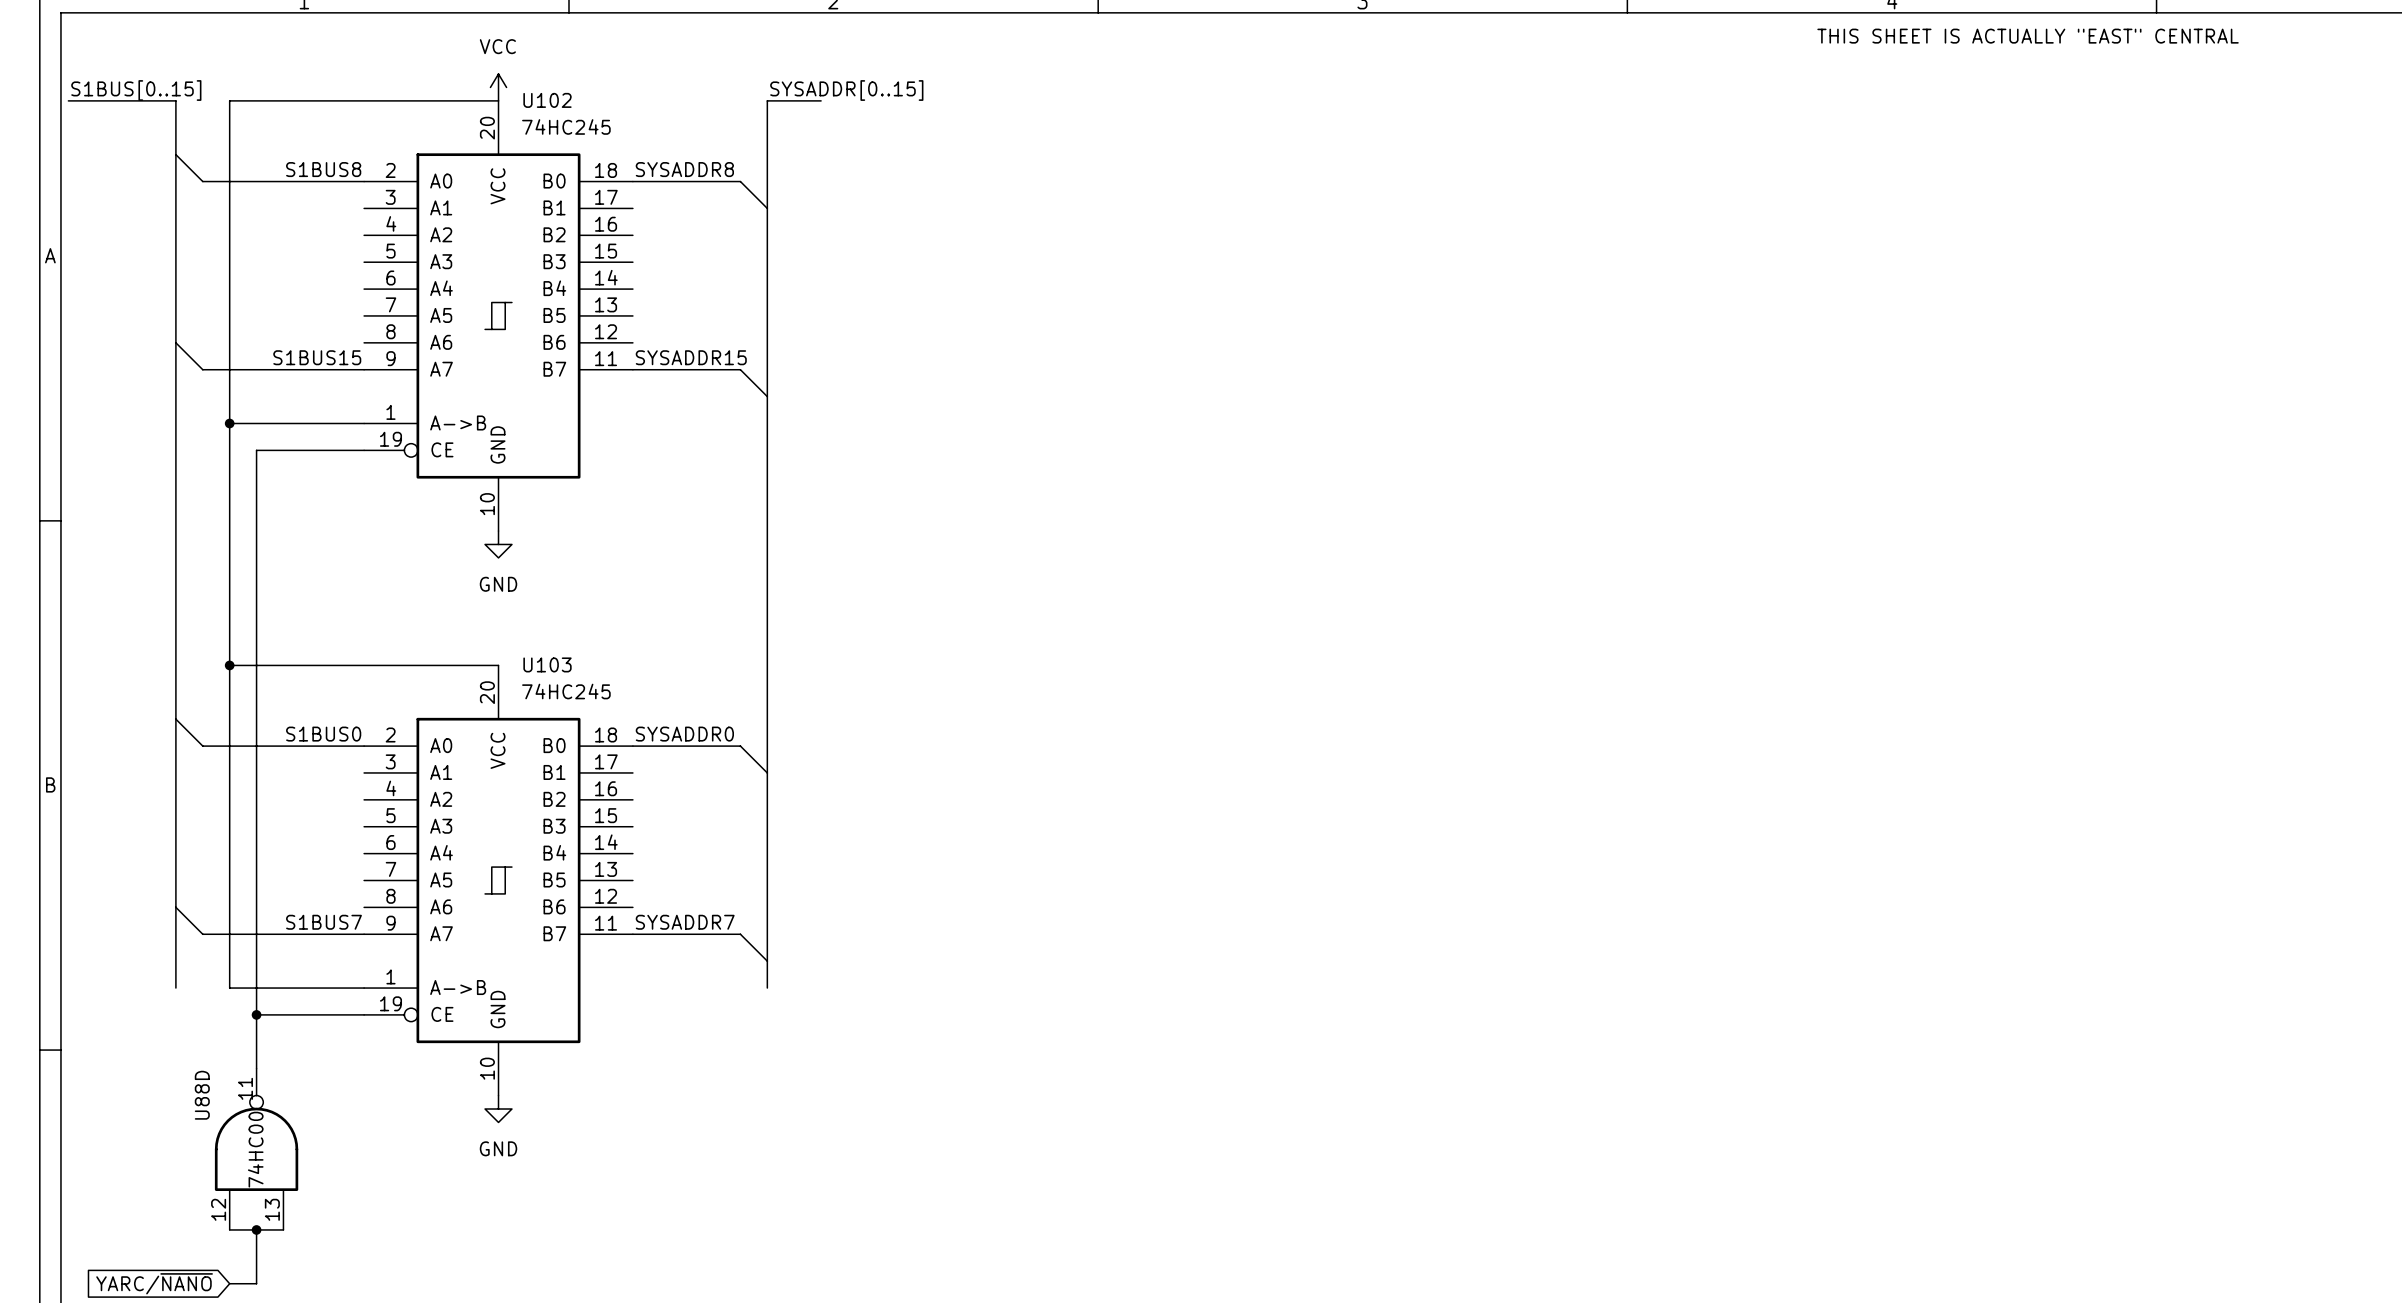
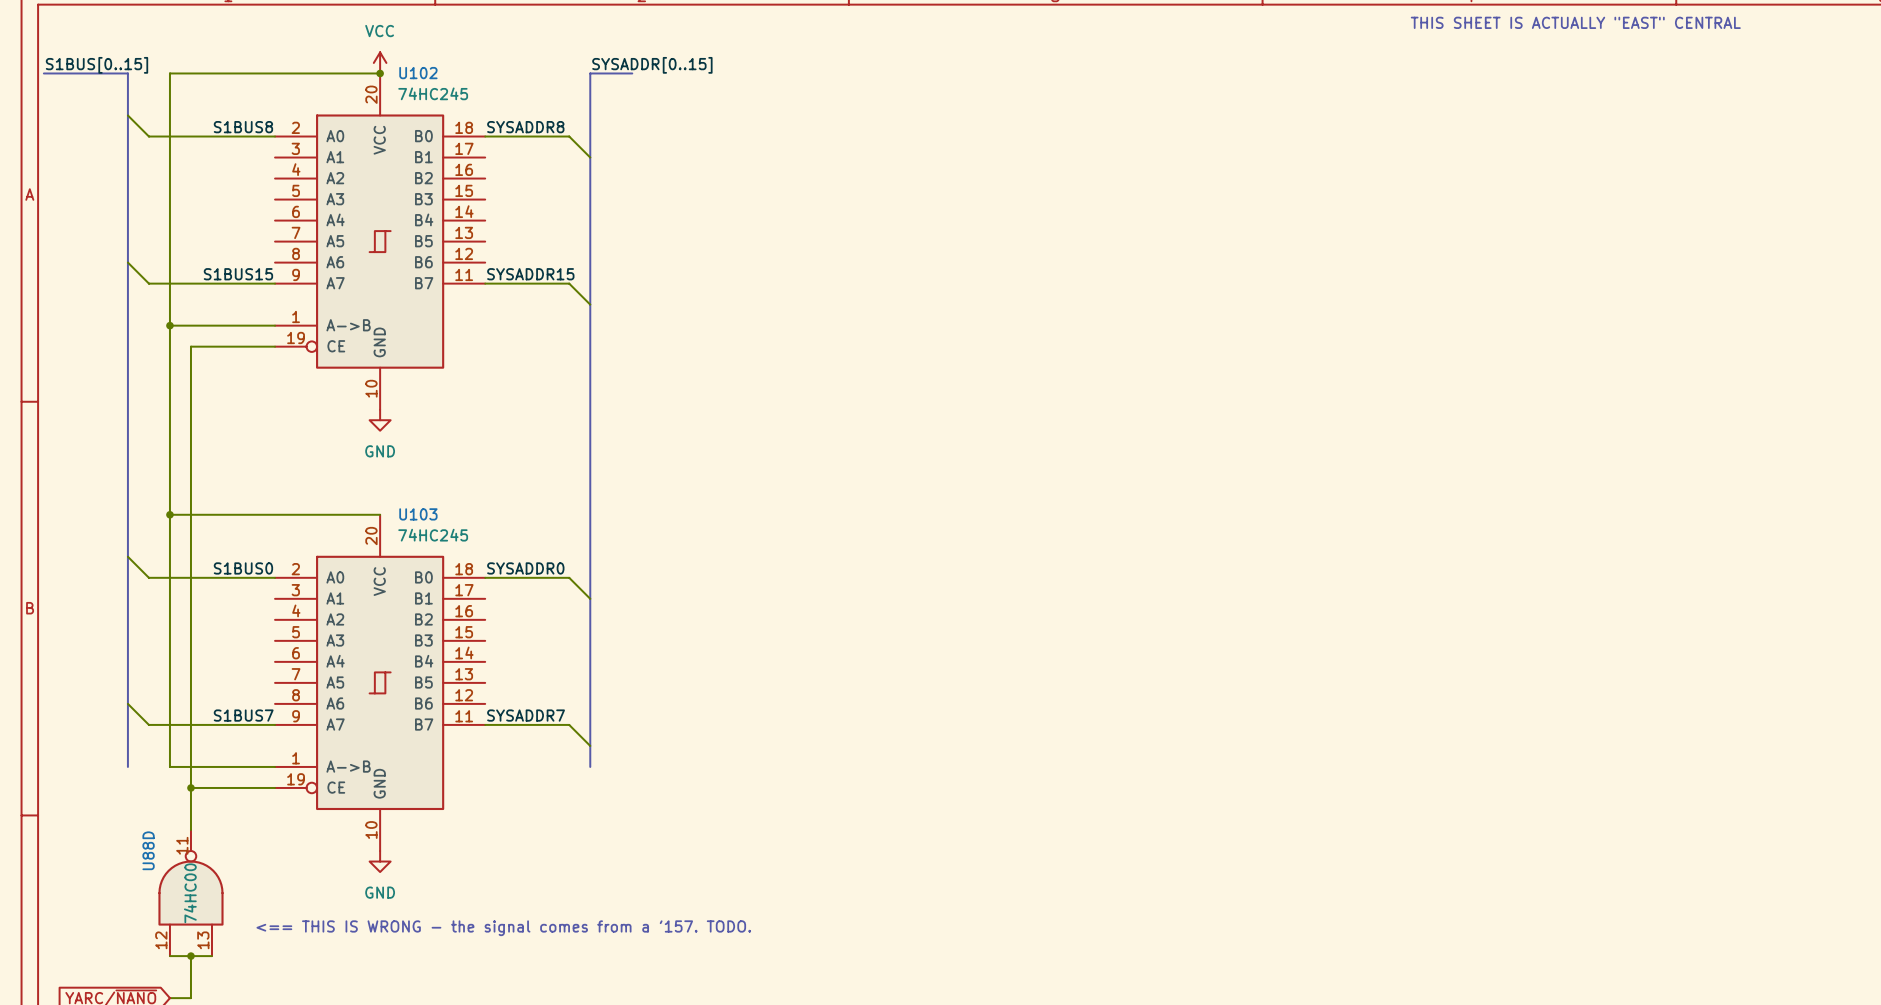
junction: none -> (380, 73)
text: none -> <== THIS IS WRONG - the signal comes from a '157. TODO. (503, 928)

